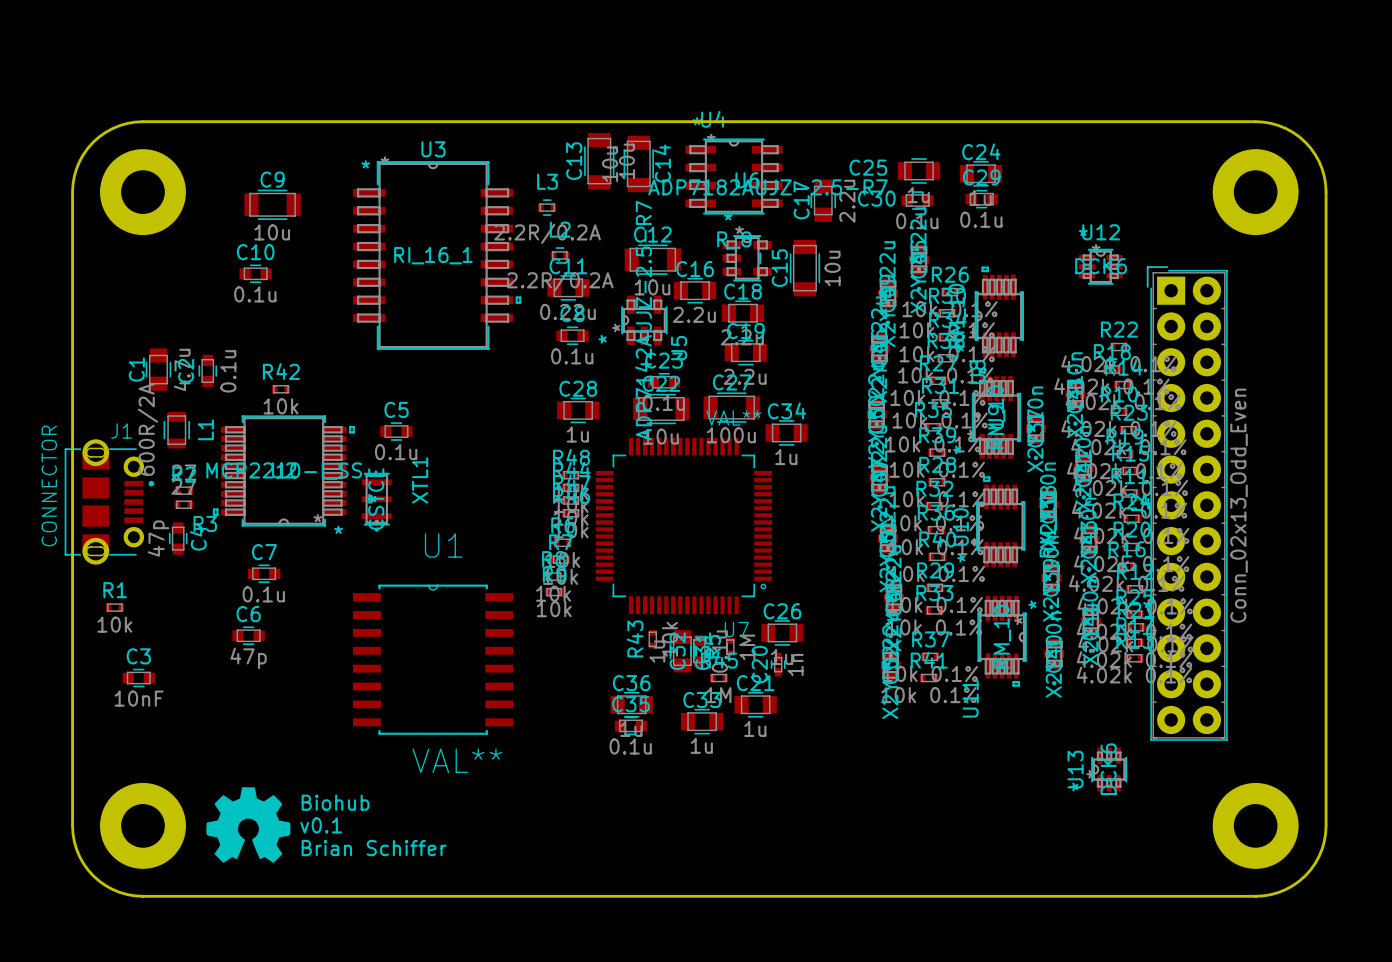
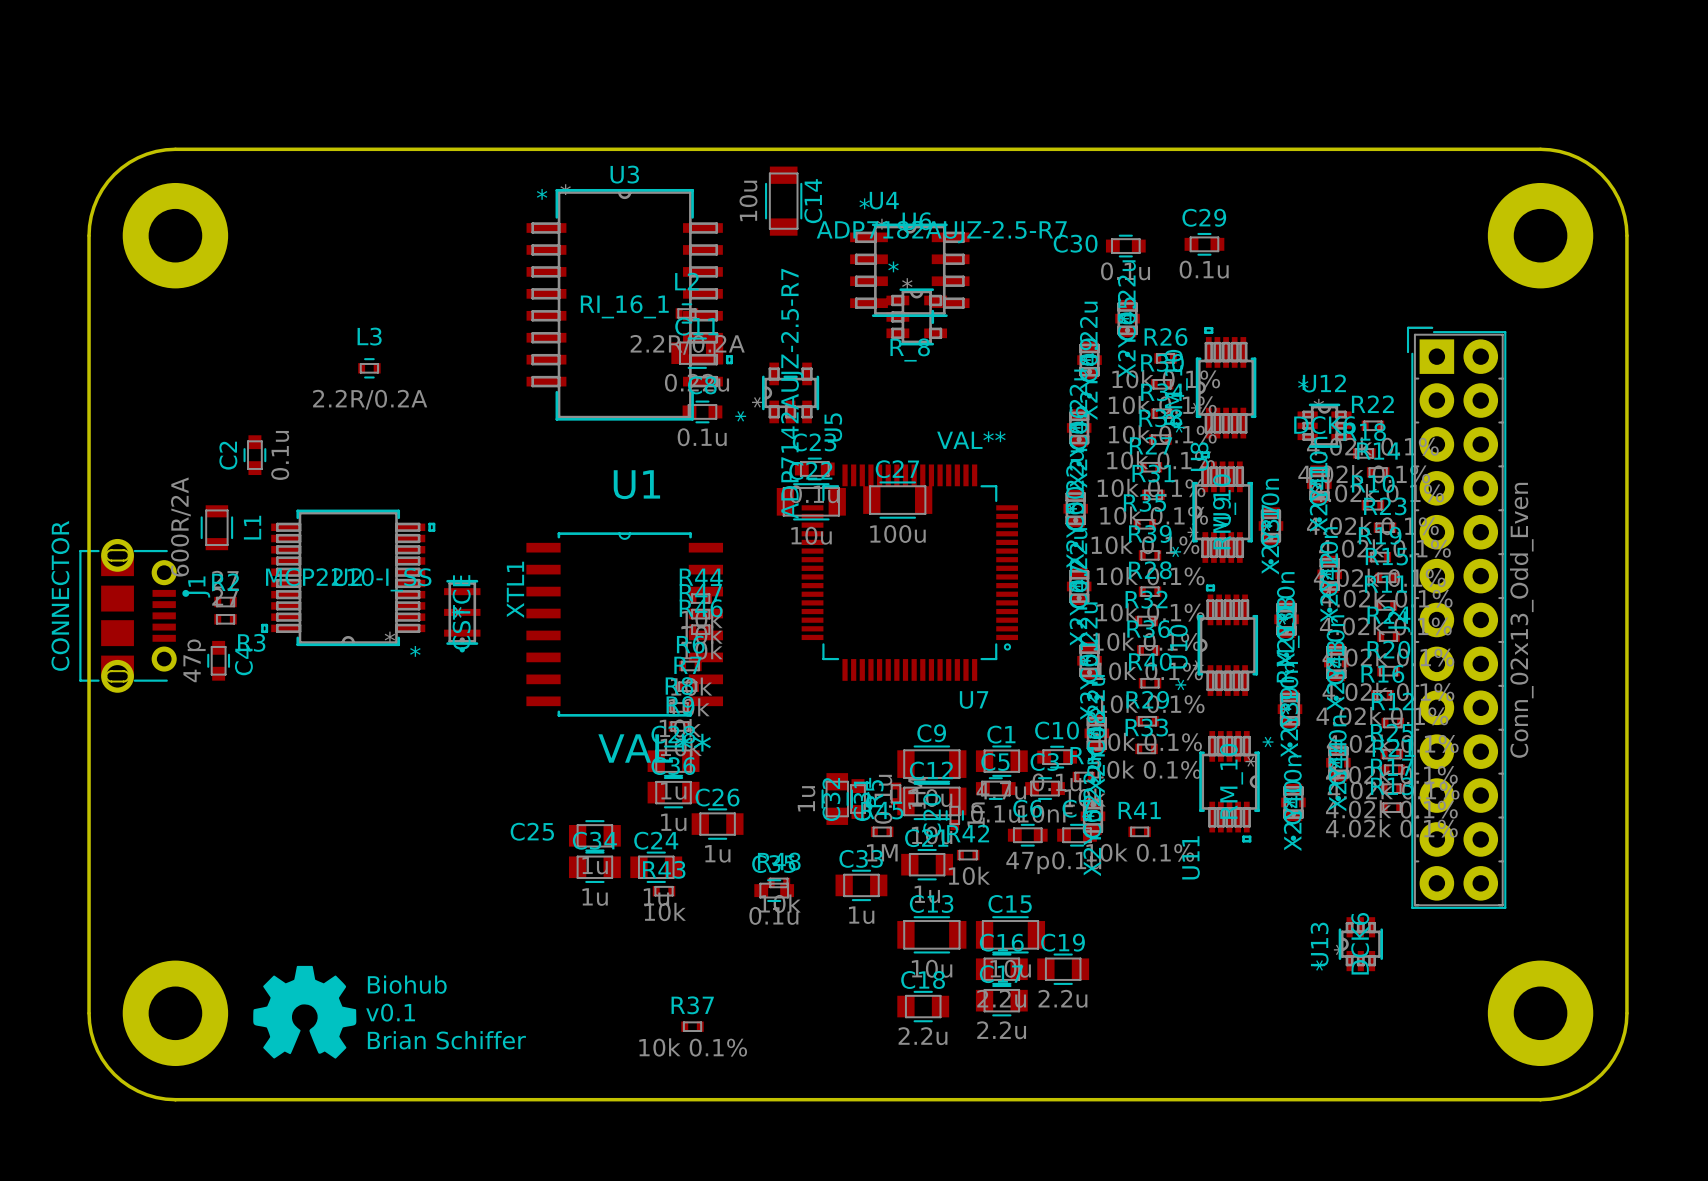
C13 rotation: 0° (599, 161) -> 90° clockwise (931, 934)
C13 position: (599, 161) -> (931, 934)
C25 position: (919, 170) -> (594, 835)
C24 position: (981, 173) -> (656, 867)
U4 position: (733, 176) -> (909, 270)
C17 rotation: 0° (823, 200) -> 90° clockwise (1001, 1000)
C17 position: (823, 200) -> (1001, 1000)
C9 position: (272, 204) -> (931, 764)
L3 position: (547, 207) -> (369, 368)
U3 position: (437, 255) -> (629, 304)
C12 position: (652, 259) -> (931, 801)
U12 position: (1100, 266) -> (1324, 425)
C15 rotation: 0° (804, 268) -> 90° clockwise (1010, 934)
C15 position: (804, 268) -> (1010, 934)
C10 position: (255, 273) -> (1057, 757)
C16 position: (695, 290) -> (1001, 969)
C18 position: (742, 313) -> (923, 1006)
C19 position: (745, 352) -> (1063, 969)
C1 rotation: 0° (158, 369) -> 90° clockwise (1001, 761)
C1 position: (158, 369) -> (1001, 761)
R42 position: (281, 389) -> (968, 855)
C28 position: (578, 410) -> (673, 761)
J1 name rotation: 0° (121, 431) -> 90° counterclockwise (199, 586)
J1 name position: J1 (121, 431) -> J1 (199, 586)
C5 position: (396, 431) -> (995, 788)
C34 position: (786, 432) -> (594, 867)
R48 position: (571, 475) -> (778, 882)
U7 position: (683, 525) -> (909, 572)
C7 position: (264, 573) -> (1077, 835)
R1 position: (114, 607) -> (1083, 776)
C26 position: (782, 632) -> (717, 824)
C6 position: (248, 635) -> (1027, 835)
R43 rotation: 0° (652, 639) -> 90° clockwise (664, 891)
R43 position: (652, 639) -> (664, 891)
R37 position: (930, 656) -> (692, 1026)
U1 position: (433, 659) -> (624, 624)
C3 position: (138, 678) -> (1045, 788)
C36 position: (631, 704) -> (673, 792)

